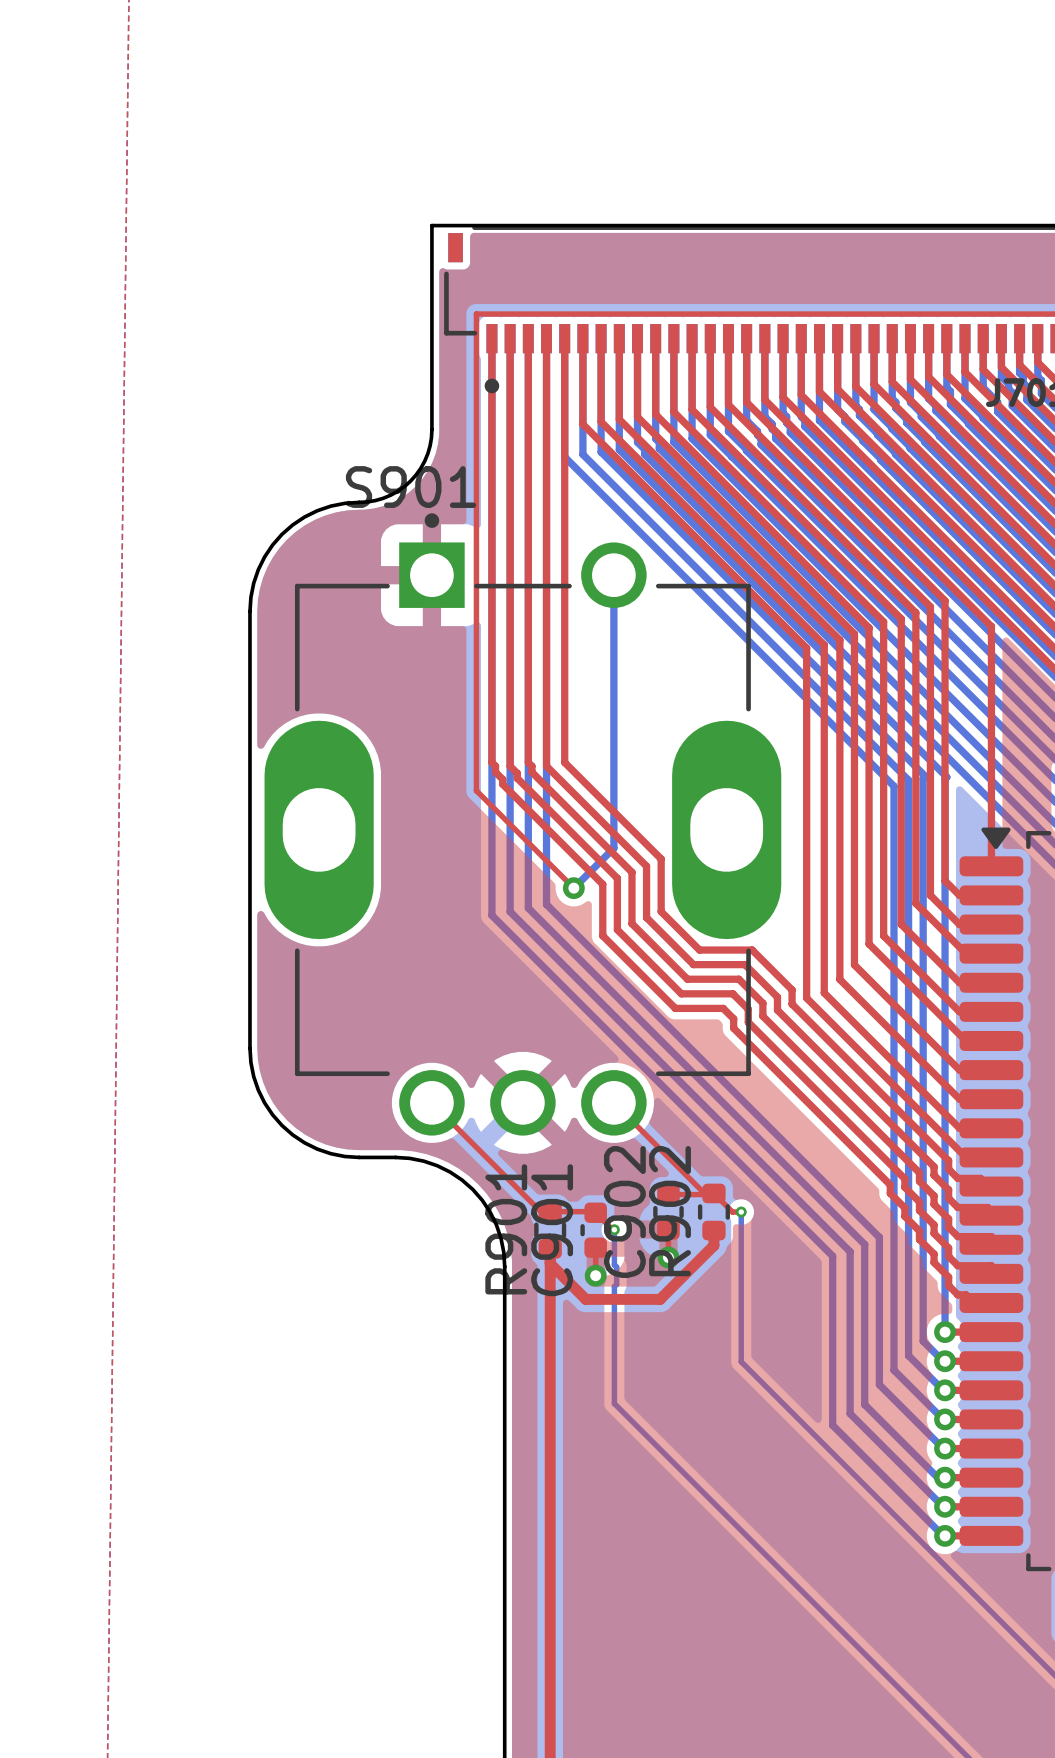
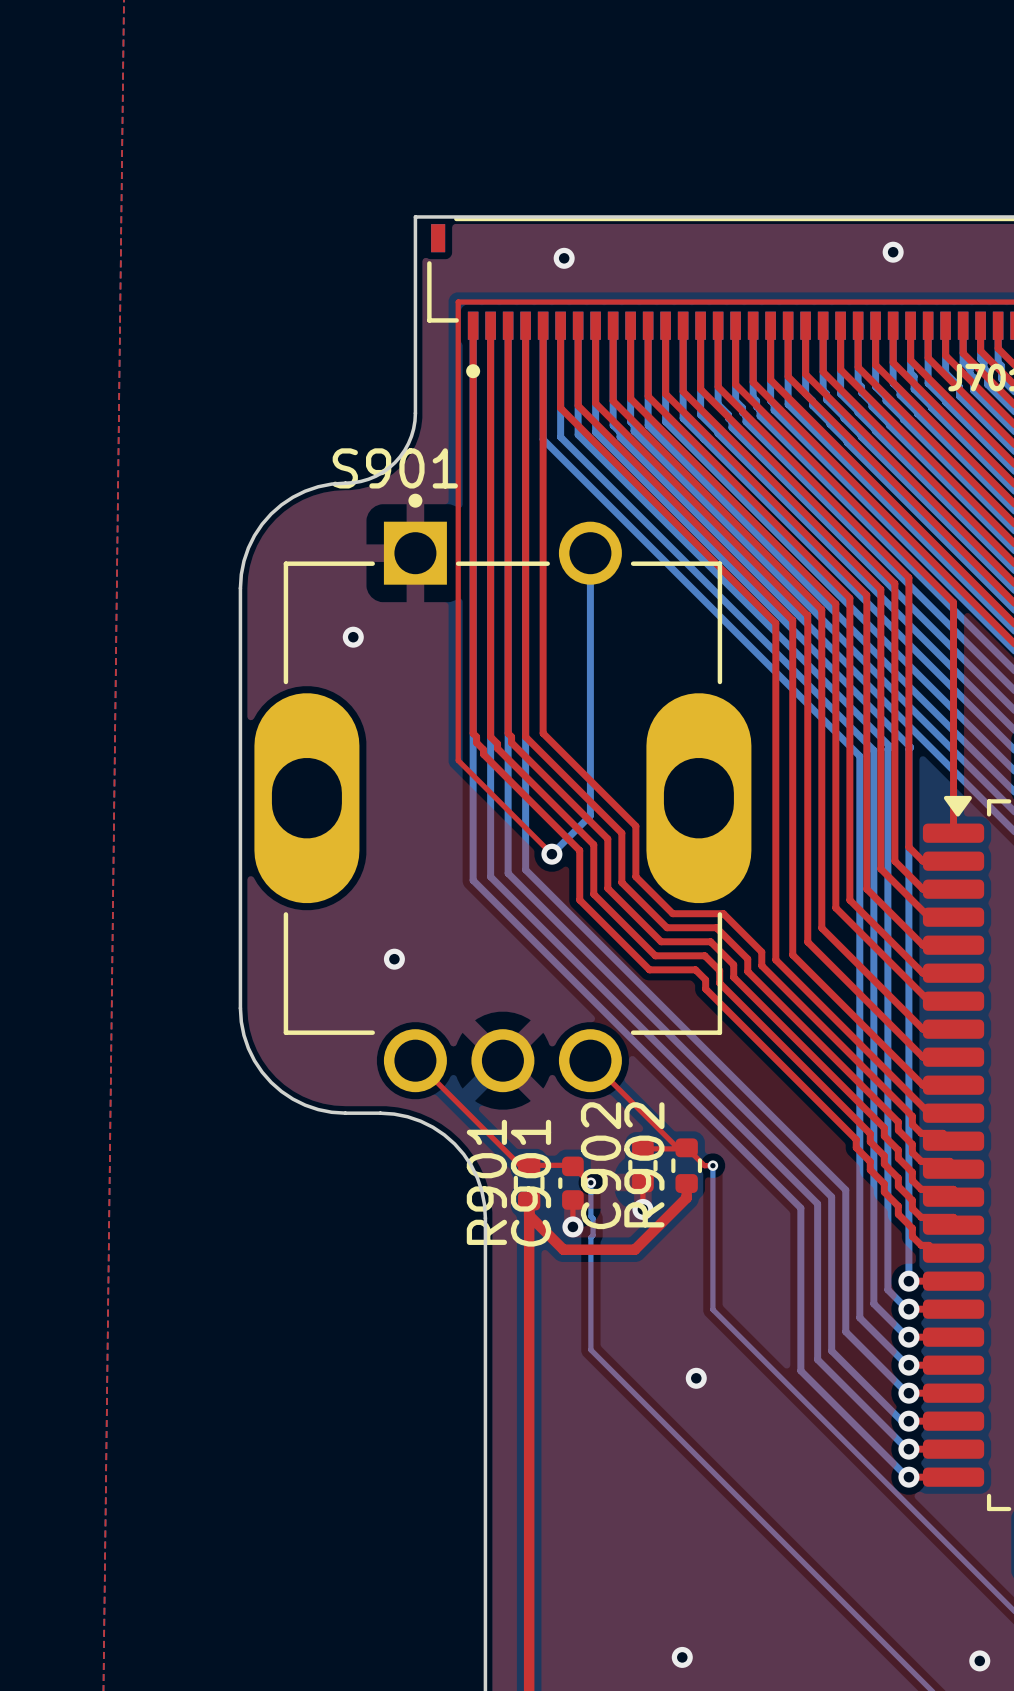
via: none -> (893, 252)
via: none -> (564, 258)
via: none -> (353, 637)
via: none -> (394, 959)
via: none -> (696, 1378)
via: none -> (682, 1657)
via: none -> (979, 1660)

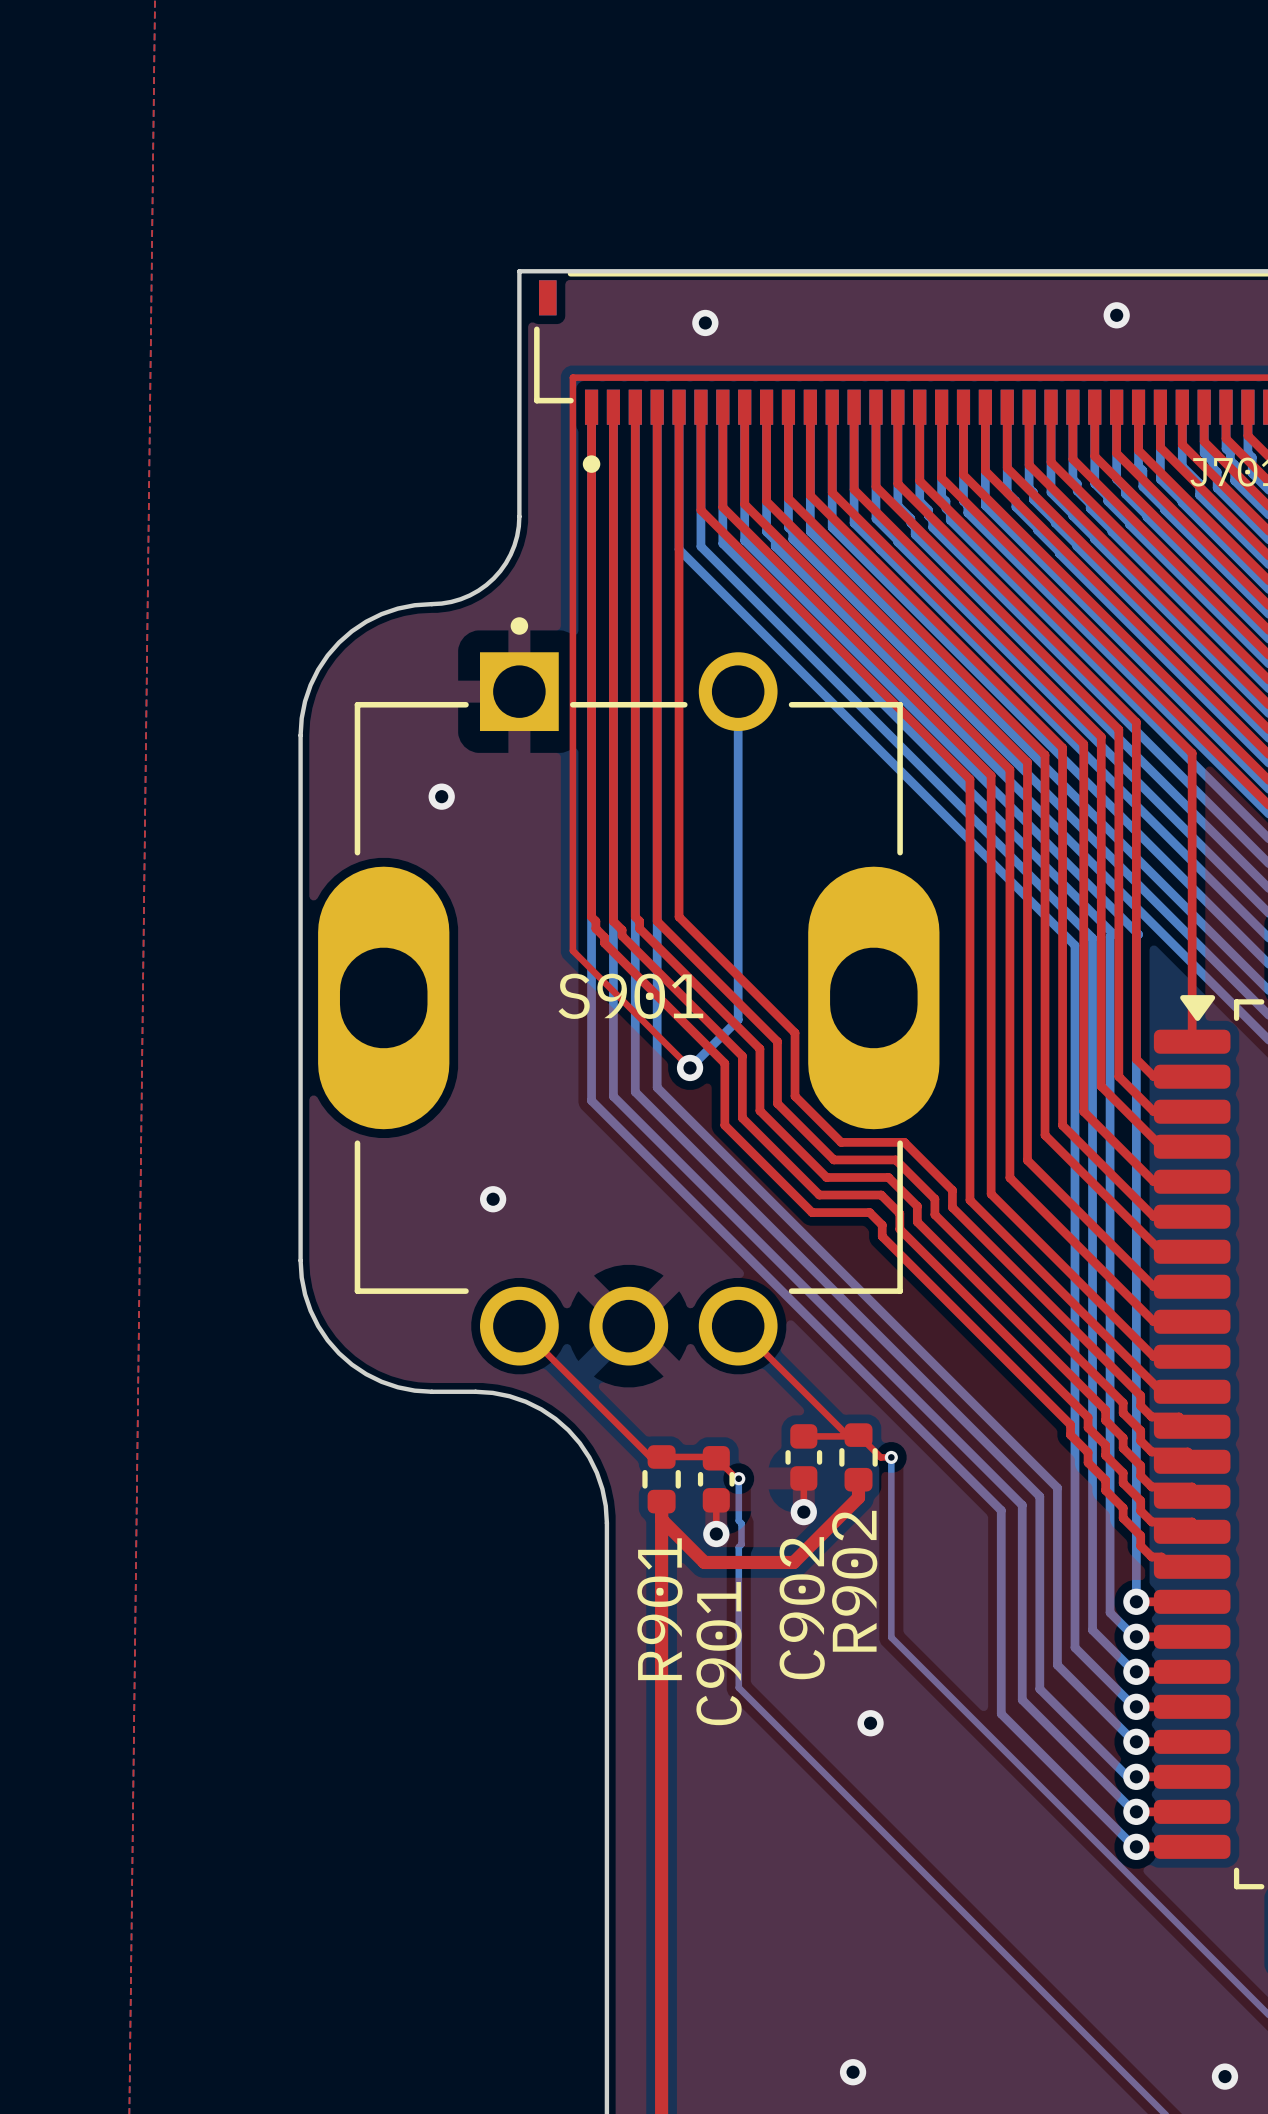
S901 name position: S901 (395, 468) -> S901 (630, 996)
R902 name position: R902 (644, 1164) -> R902 (854, 1581)
C902 name position: C902 (601, 1165) -> C902 (802, 1608)
R901 name position: R901 (486, 1182) -> R901 (659, 1609)
C901 name position: C901 (531, 1183) -> C901 (719, 1653)

